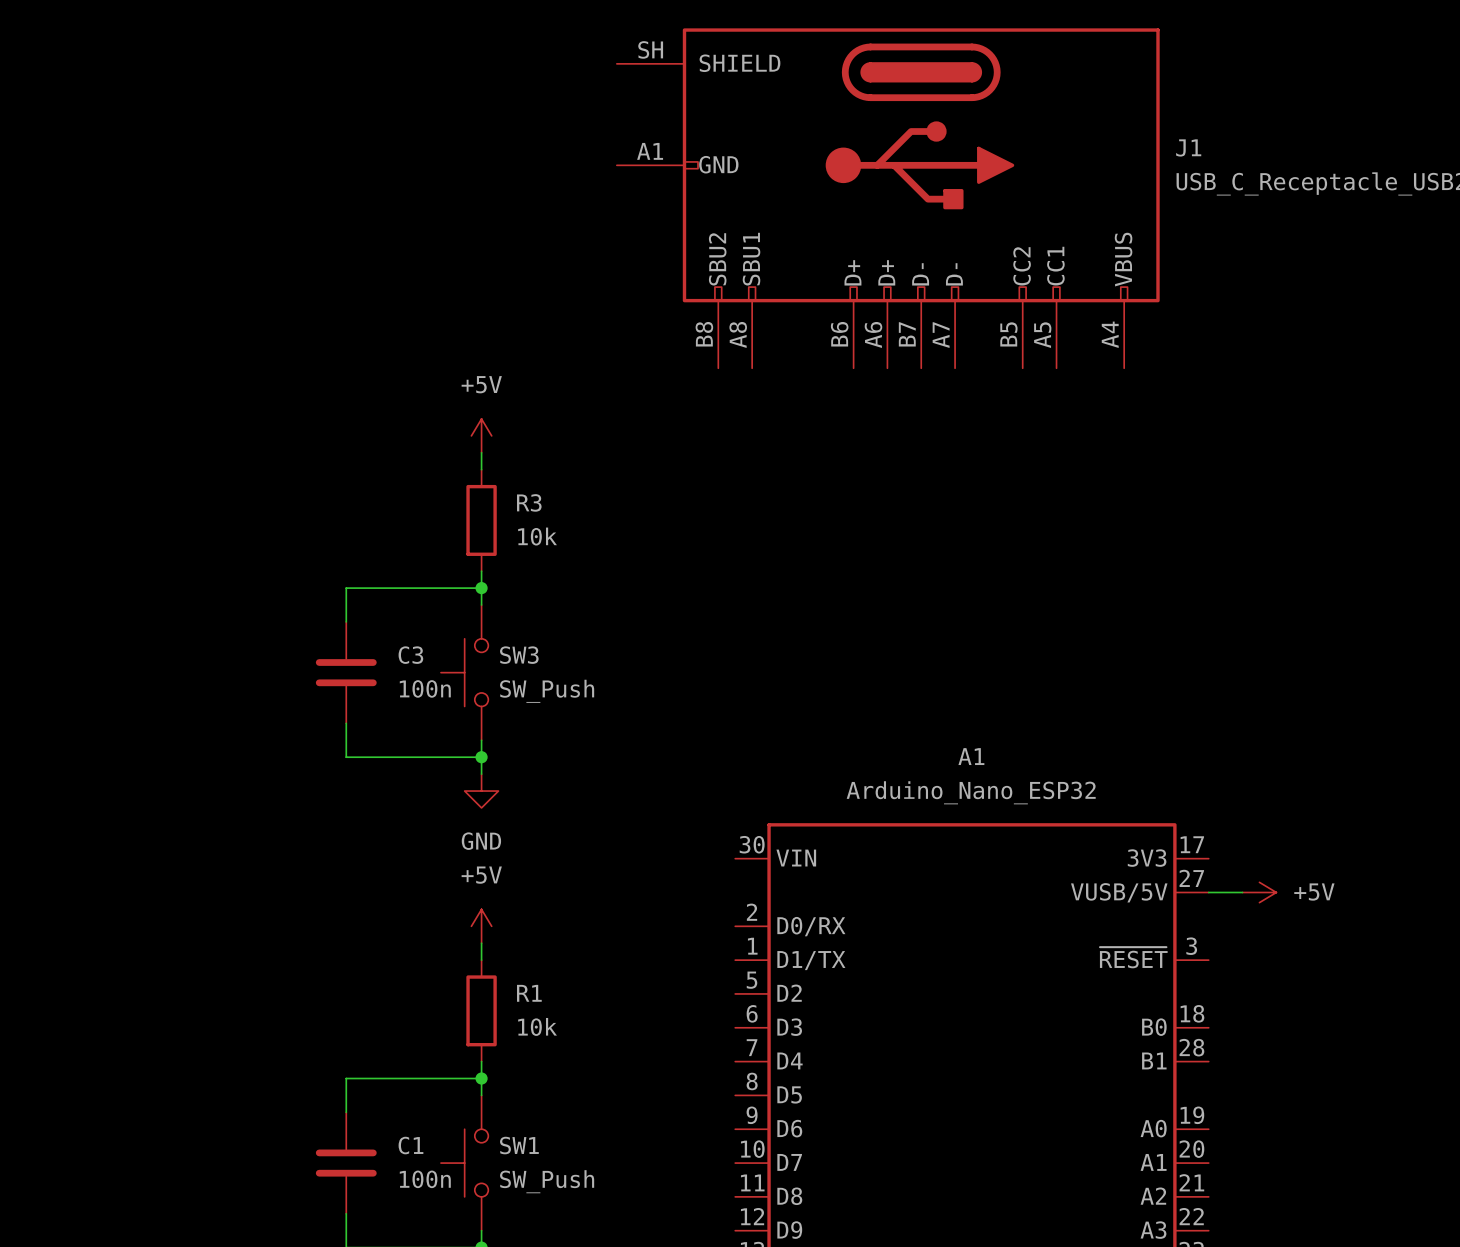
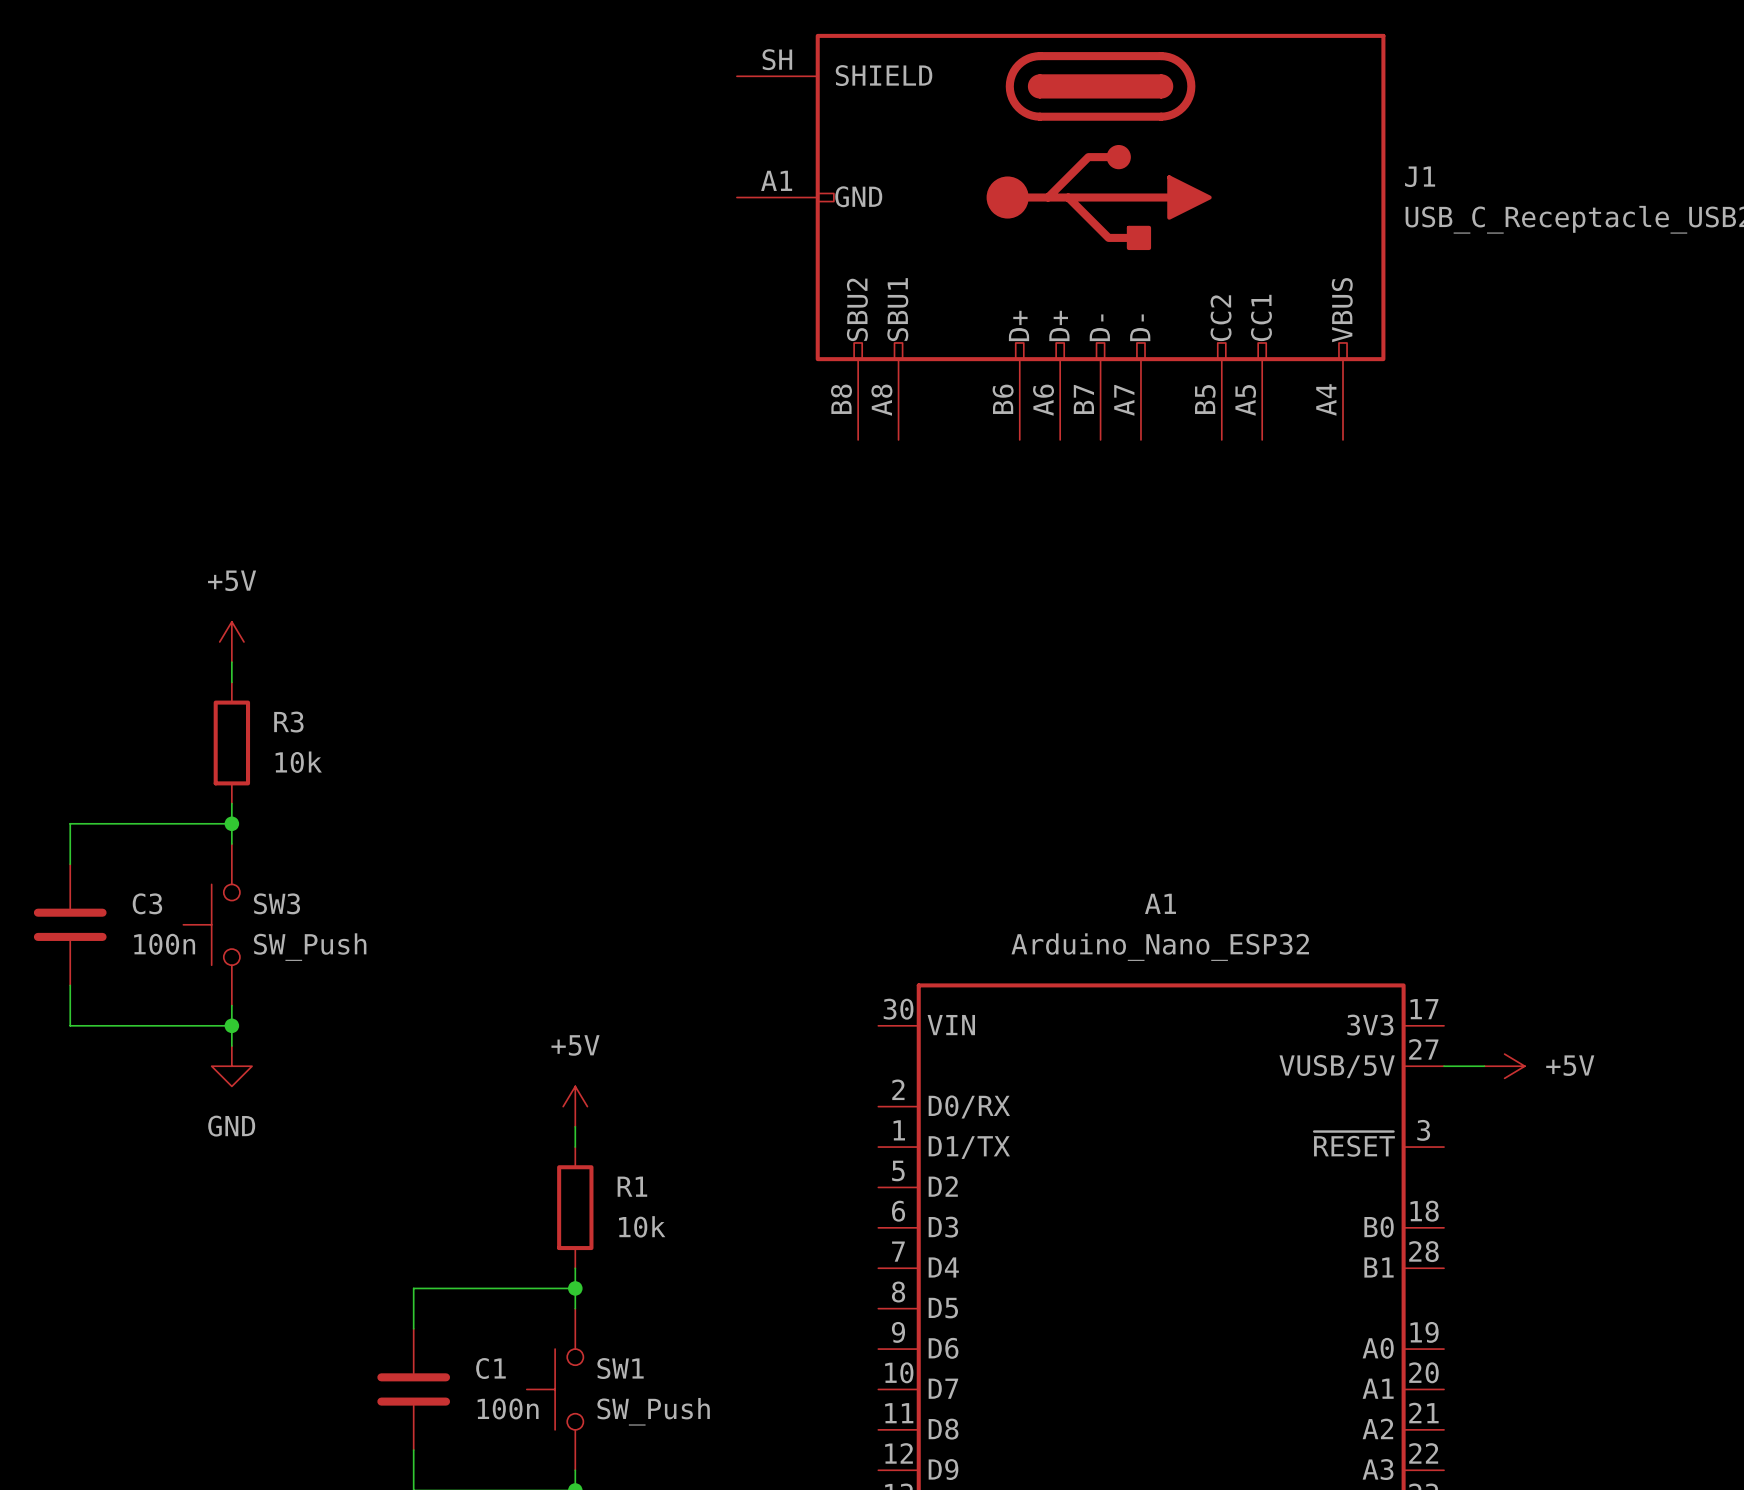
power symbol position: +5V (481, 435) -> +5V (231, 641)
wire: (481, 452) (481, 469) -> (231, 662) (231, 682)
R3 position: (481, 520) -> (231, 742)
wire: (481, 571) (481, 605) -> (231, 803) (231, 844)
wire: (481, 588) (346, 588) (346, 621) -> (231, 823) (70, 823) (70, 864)
junction: (481, 588) -> none
C3 position: (346, 672) -> (70, 924)
SW3 position: (464, 672) -> (211, 924)
junction: none -> (231, 823)
wire: (346, 723) (346, 757) (481, 757) -> (70, 985) (70, 1025) (231, 1025)
wire: (481, 740) (481, 774) -> (231, 1005) (231, 1046)
junction: (481, 757) -> none
power symbol position: GND (481, 791) -> GND (231, 1066)
junction: none -> (231, 1025)

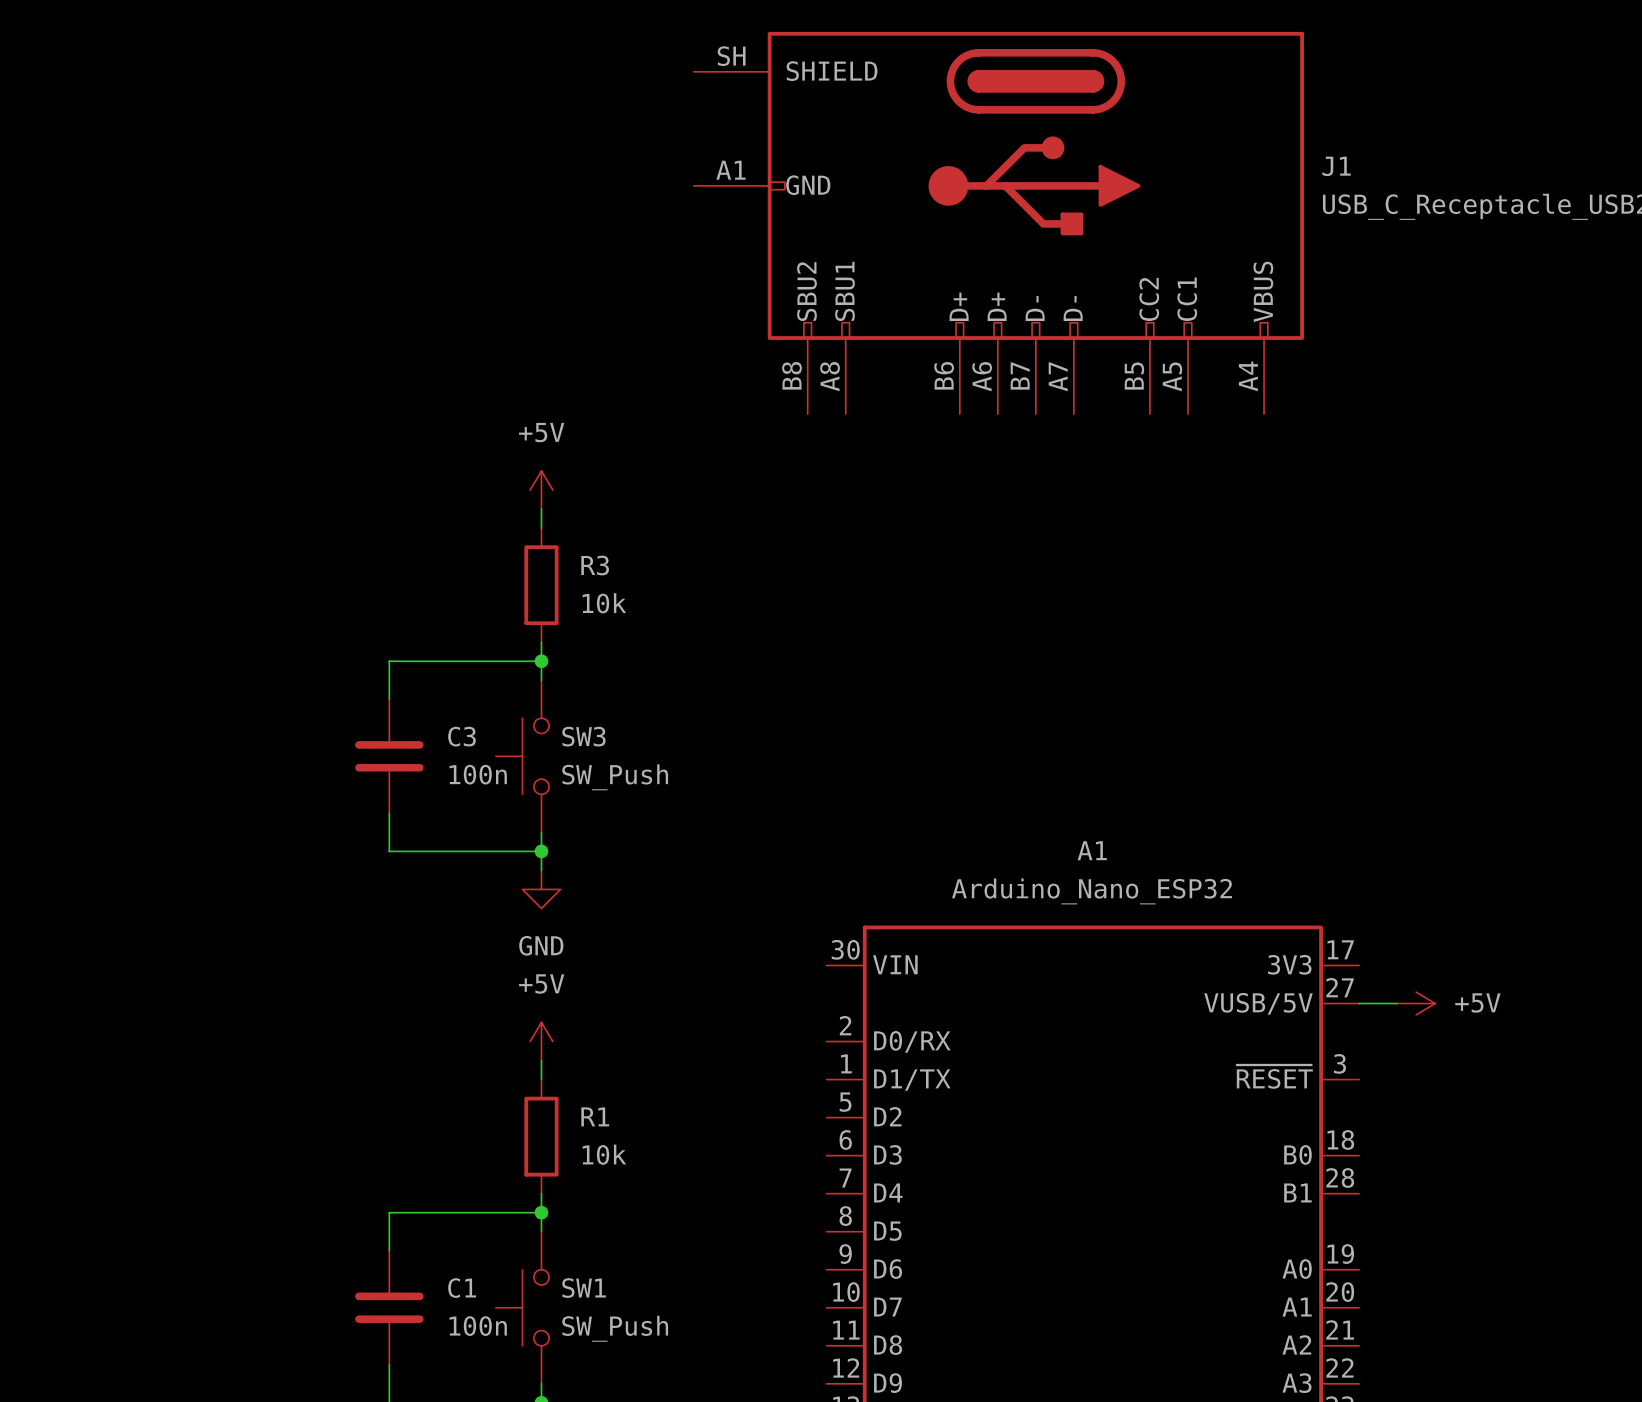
power symbol position: +5V (231, 641) -> +5V (541, 490)
wire: (231, 662) (231, 682) -> (541, 509) (541, 528)
junction: none -> (541, 661)
R3 position: (231, 742) -> (541, 585)
wire: (231, 803) (231, 844) -> (541, 642) (541, 680)
wire: (231, 823) (70, 823) (70, 864) -> (541, 661) (389, 661) (389, 699)
junction: (231, 823) -> none
junction: none -> (541, 851)
C3 position: (70, 924) -> (389, 756)
SW3 position: (211, 924) -> (522, 756)
wire: (70, 985) (70, 1025) (231, 1025) -> (389, 813) (389, 851) (541, 851)
wire: (231, 1005) (231, 1046) -> (541, 832) (541, 870)
junction: (231, 1025) -> none
power symbol position: GND (231, 1066) -> GND (541, 889)

